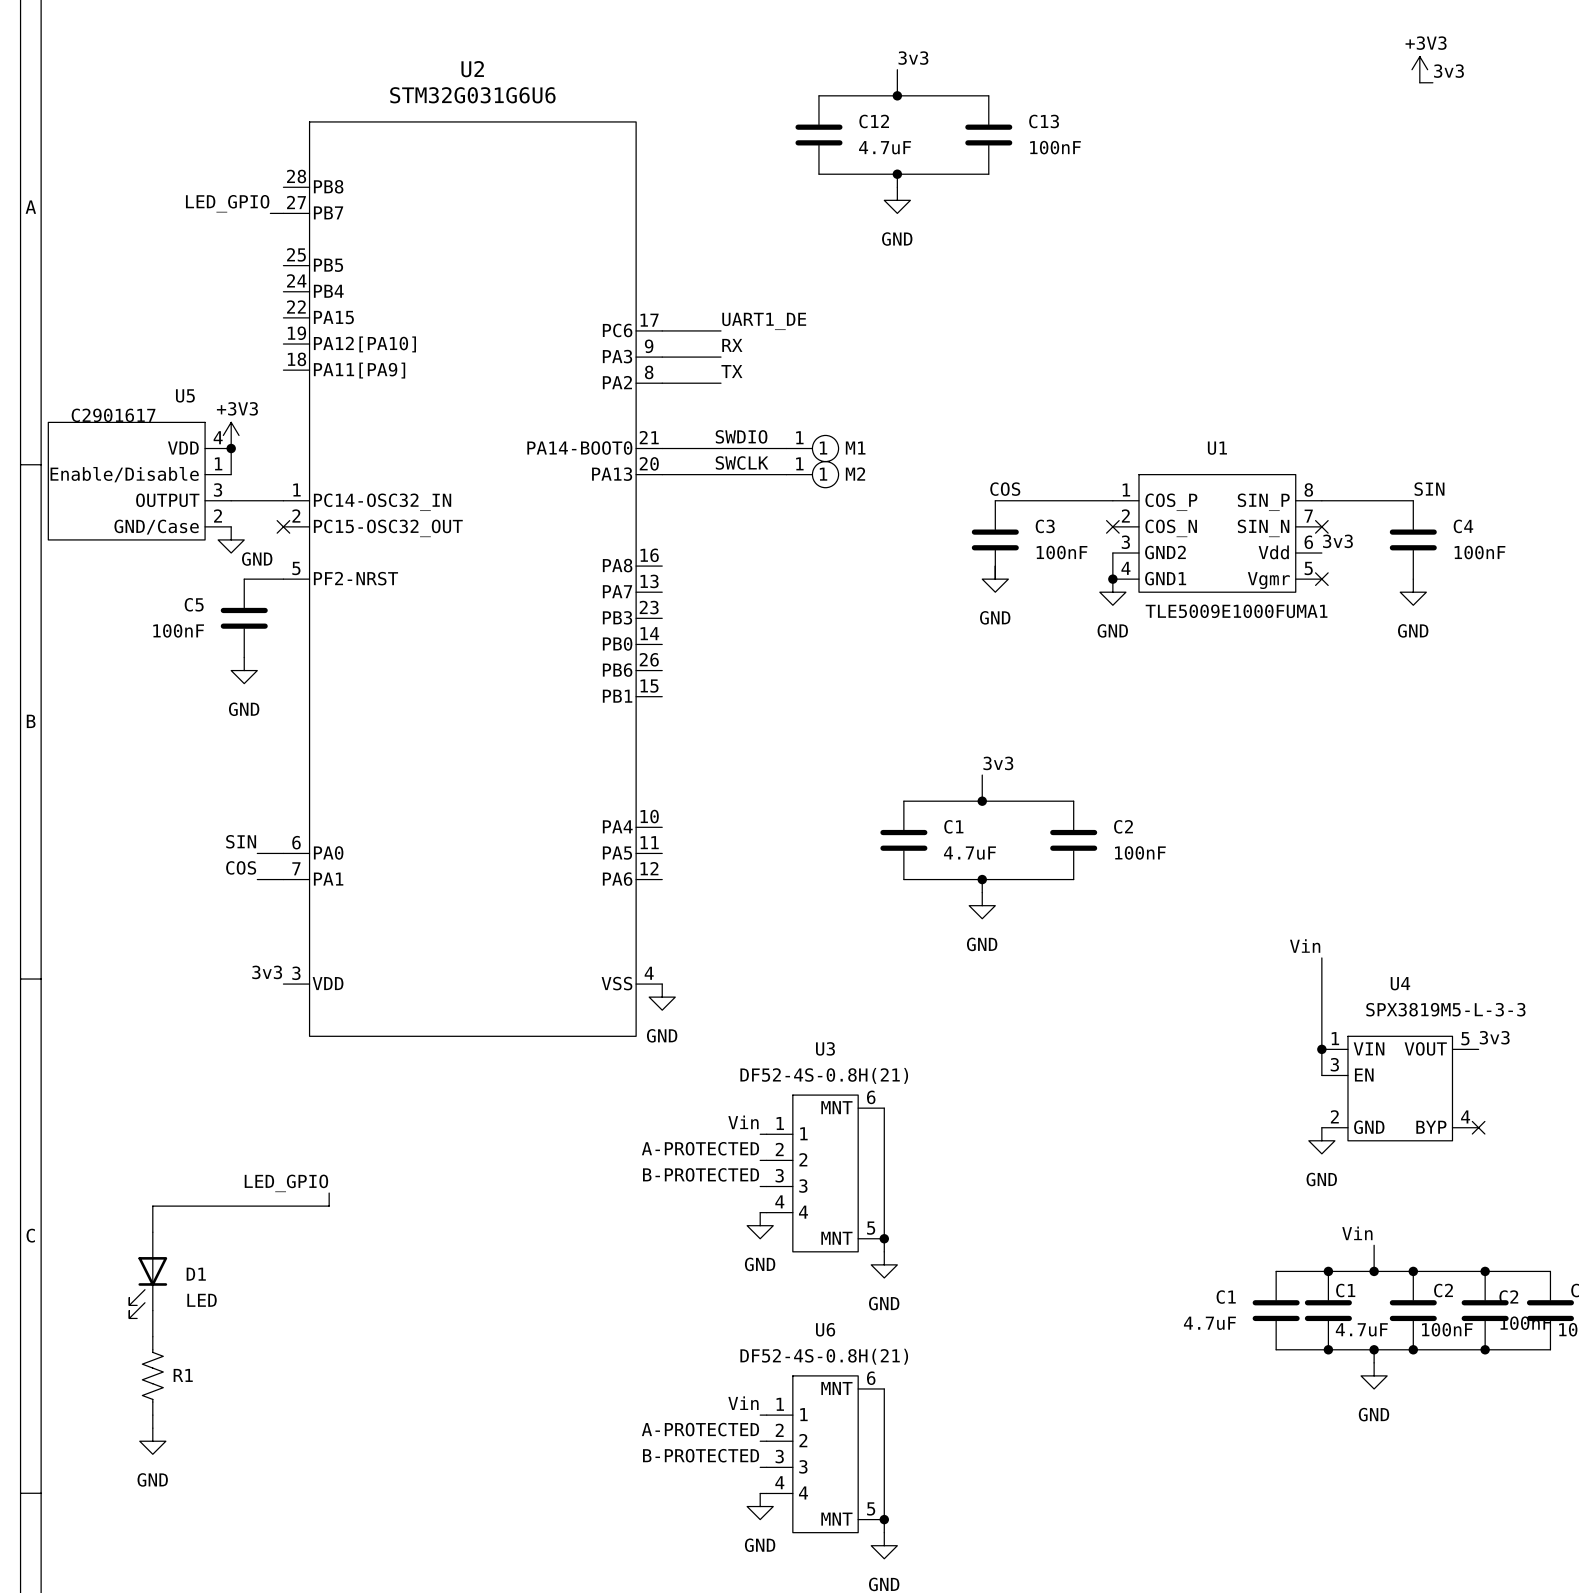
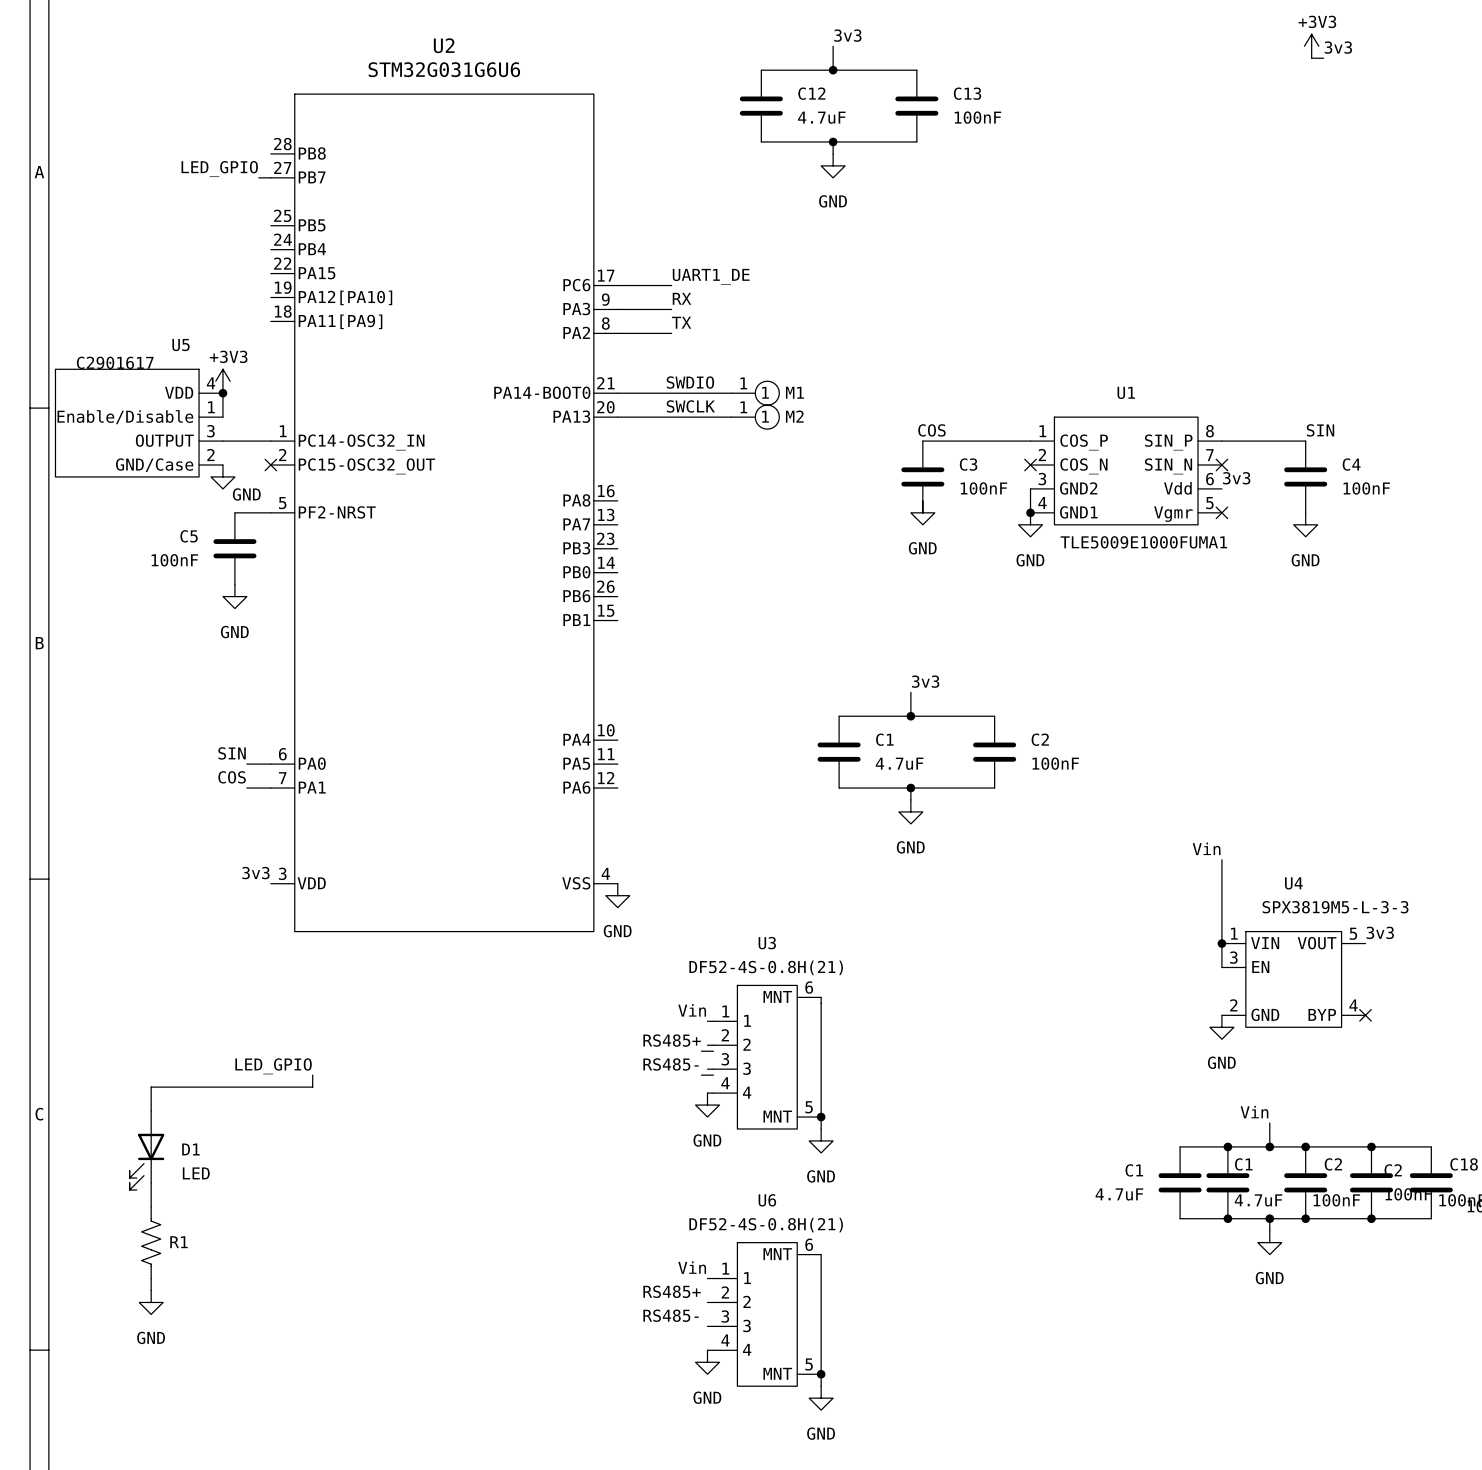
label: A-PROTECTED (700, 1148) -> RS485+ (672, 1040)
wire: none -> (701, 1051) (713, 1051)
label: B-PROTECTED (701, 1174) -> RS485- (671, 1064)
wire: none -> (701, 1075) (713, 1075)
label: A-PROTECTED (700, 1429) -> RS485+ (672, 1291)
label: B-PROTECTED (701, 1455) -> RS485- (671, 1315)

